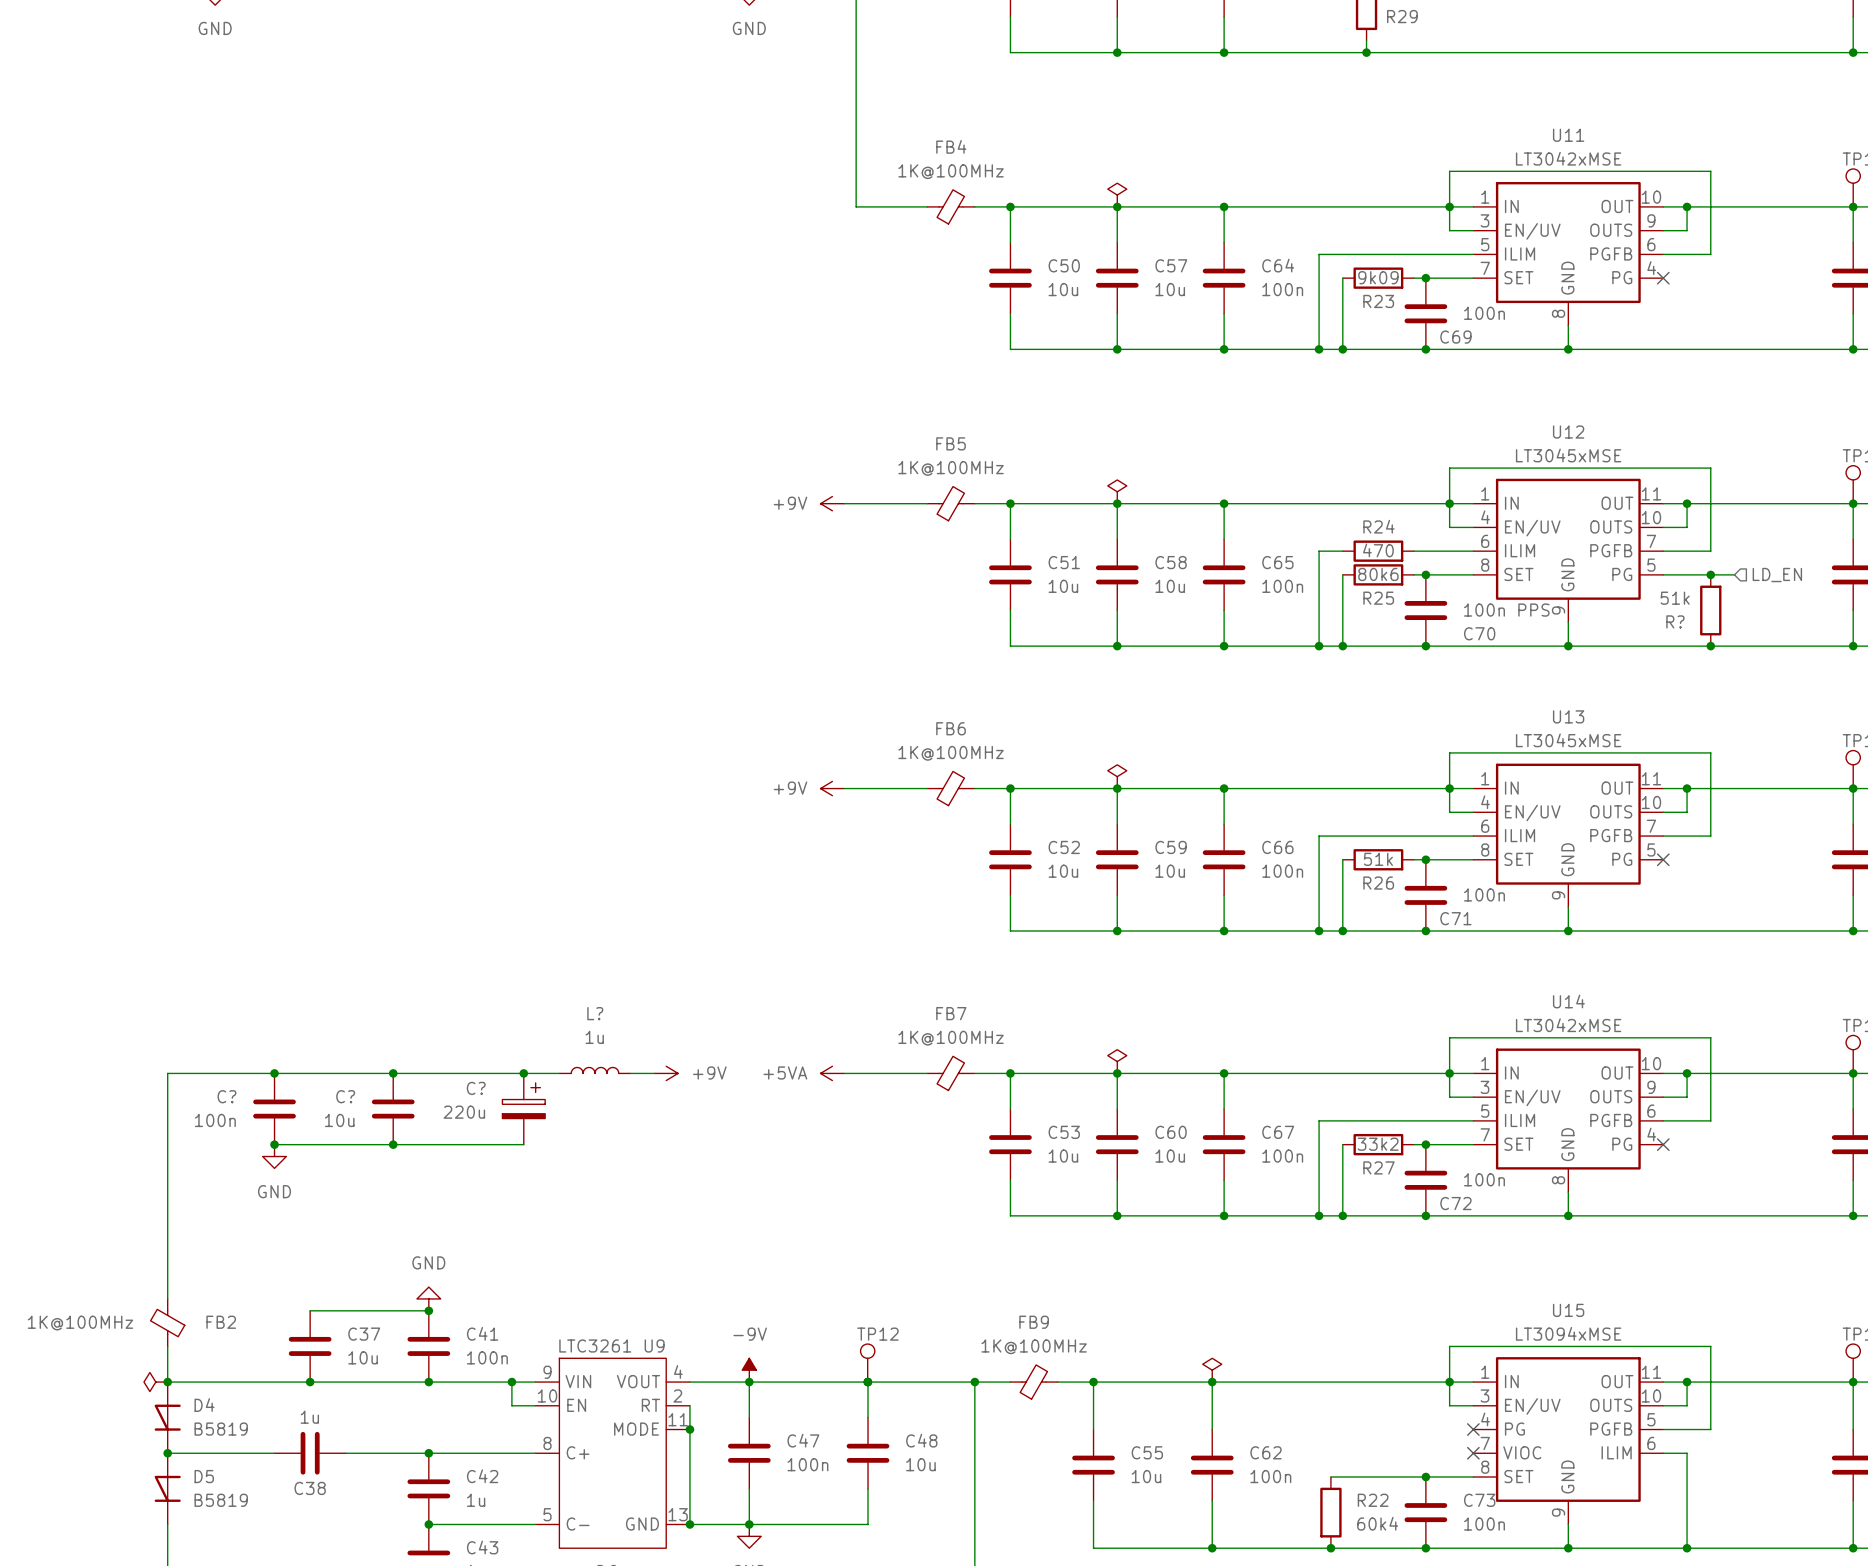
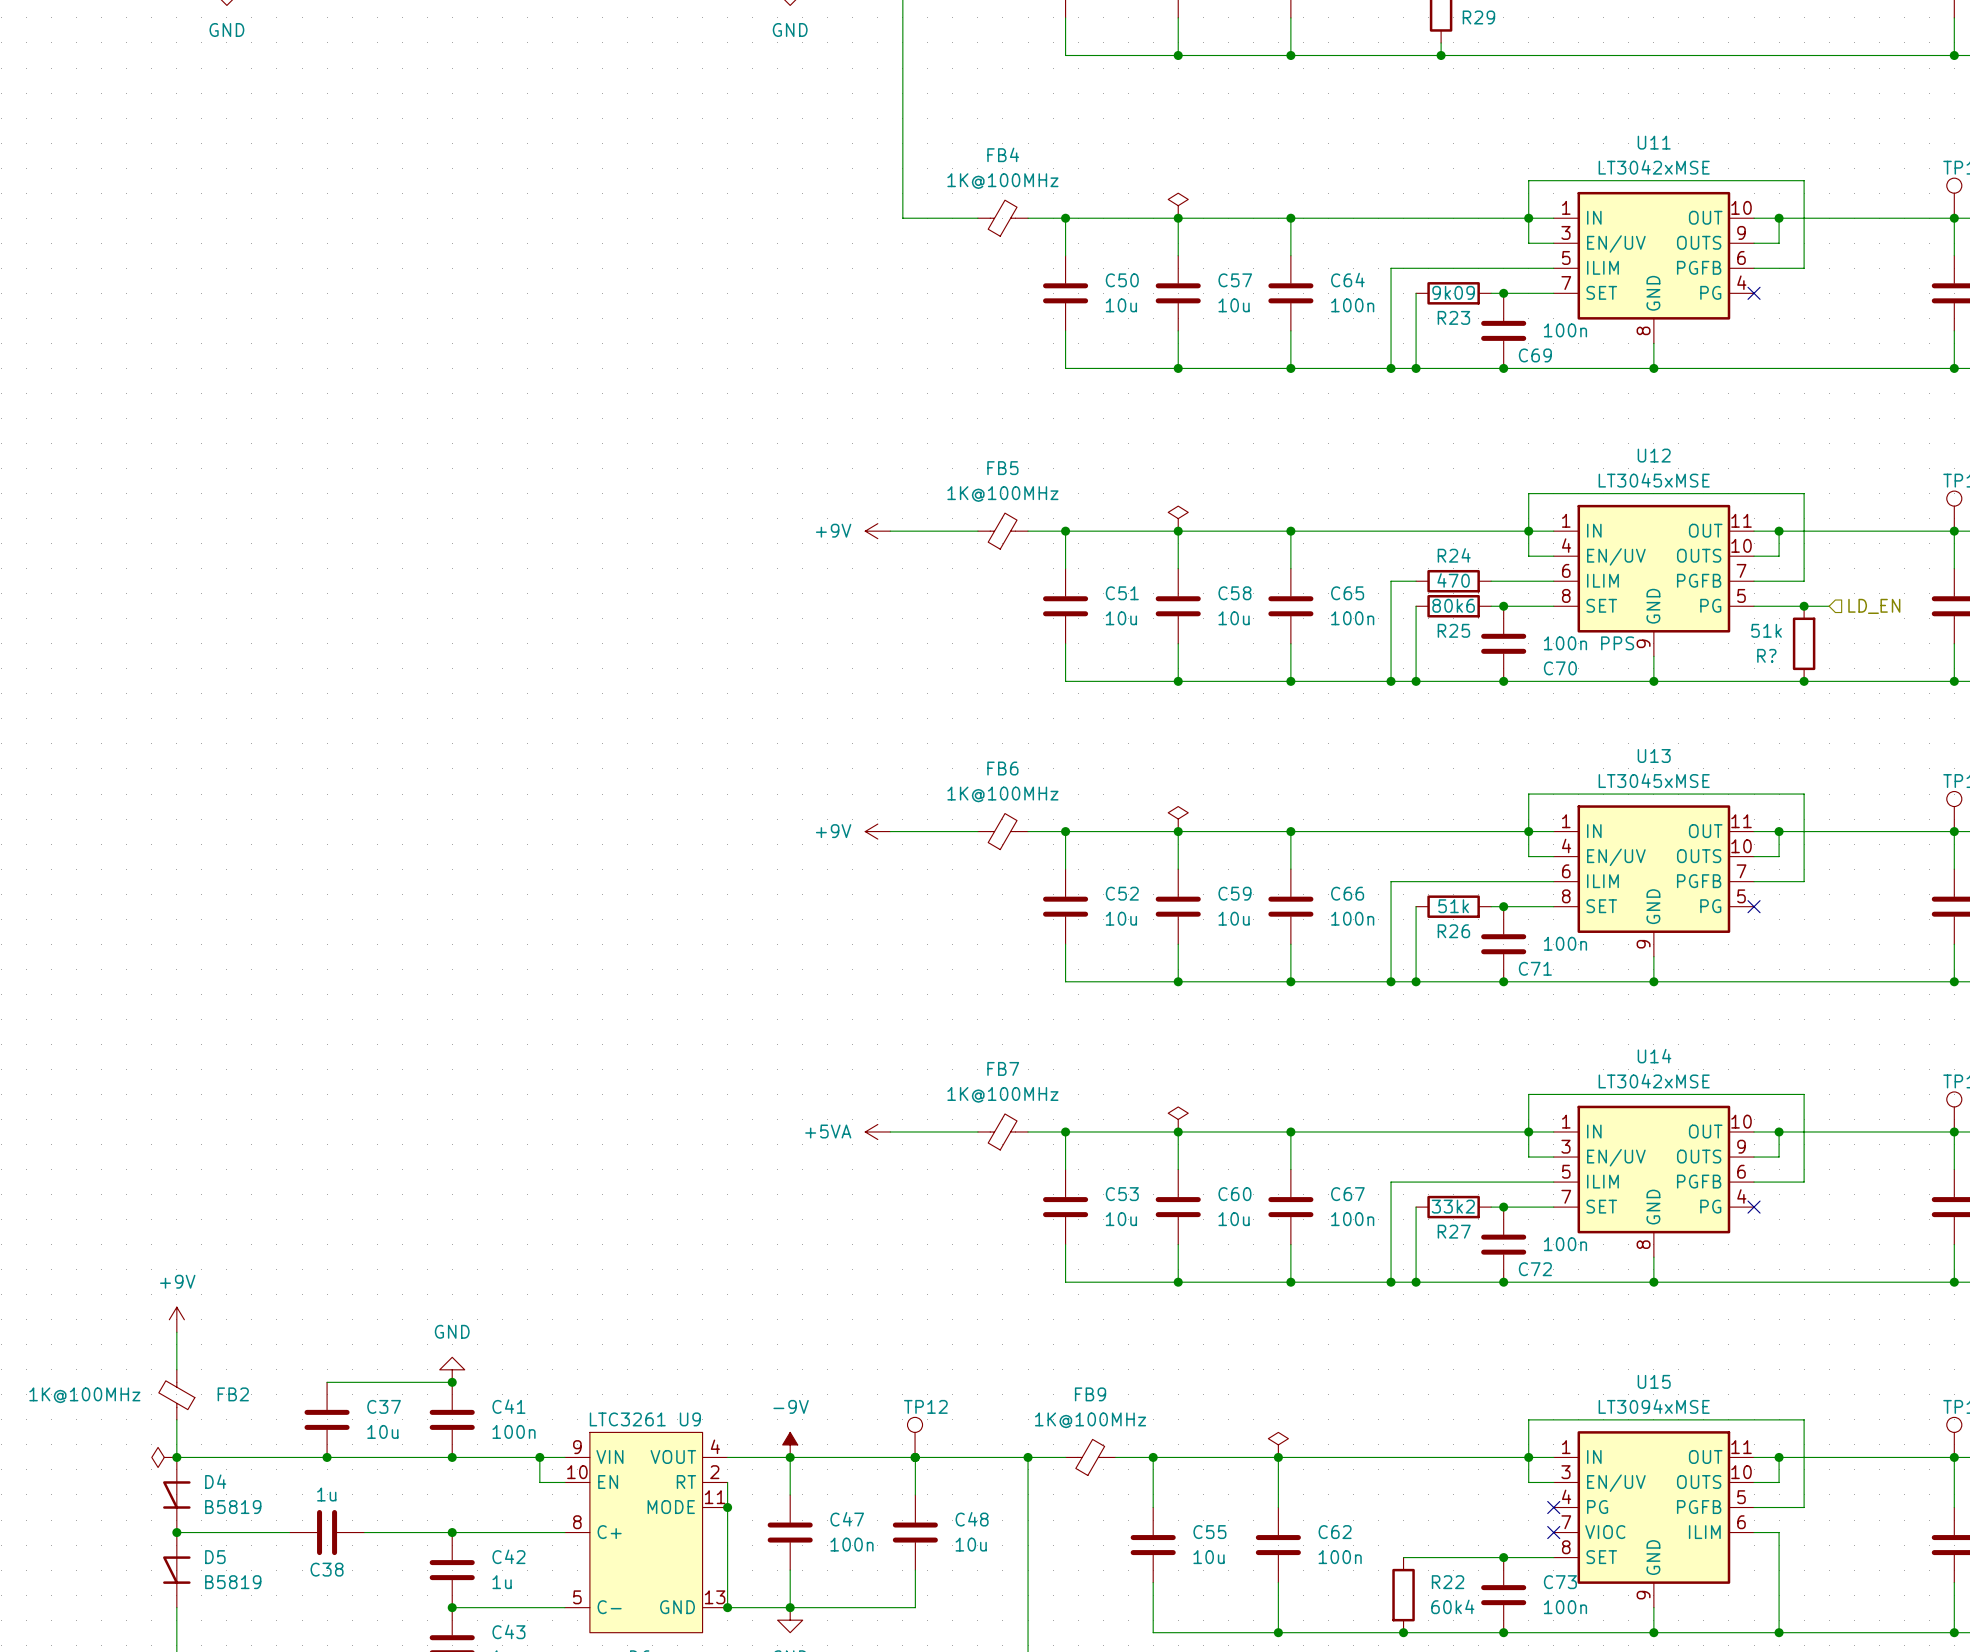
L?: 1u (595, 1070) -> none
junction: (274, 1073) -> none
junction: (393, 1073) -> none
junction: (523, 1073) -> none
wire: (559, 1073) (167, 1073) (167, 1263) -> none
wire: (630, 1073) (654, 1073) -> none
power symbol: +9V (666, 1073) -> none
C?: 100n (274, 1109) -> none
C?: 10u (393, 1109) -> none
C?: 220u (523, 1109) -> none
wire: (274, 1144) (523, 1144) -> none
junction: (274, 1144) -> none
junction: (393, 1144) -> none
power symbol: GND (274, 1156) -> none
power symbol: none -> +9V (176, 1319)

